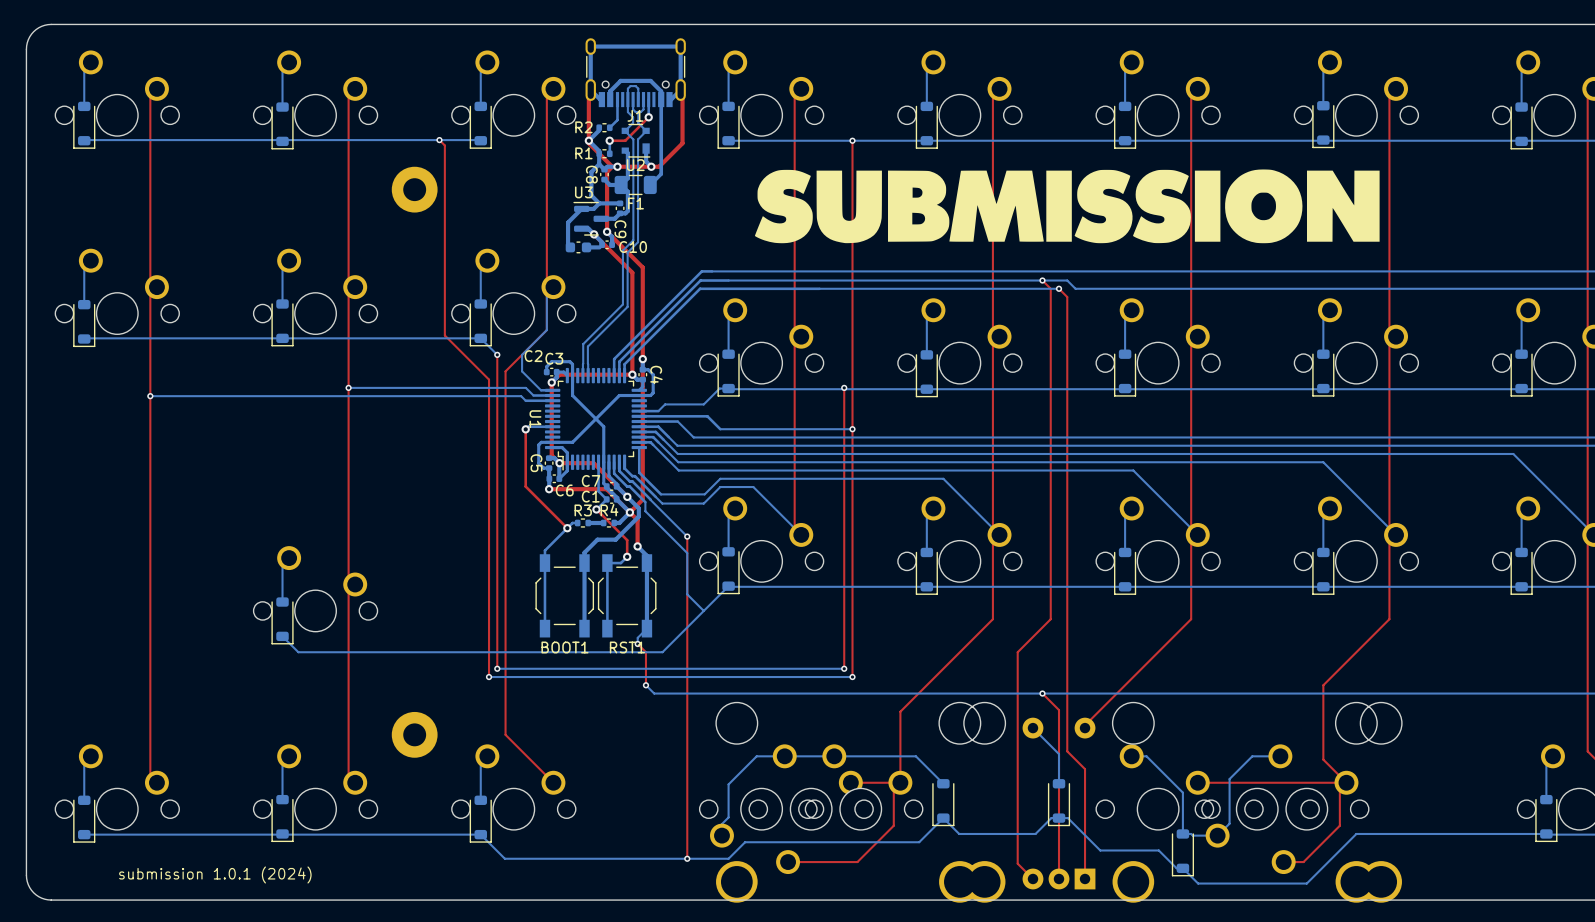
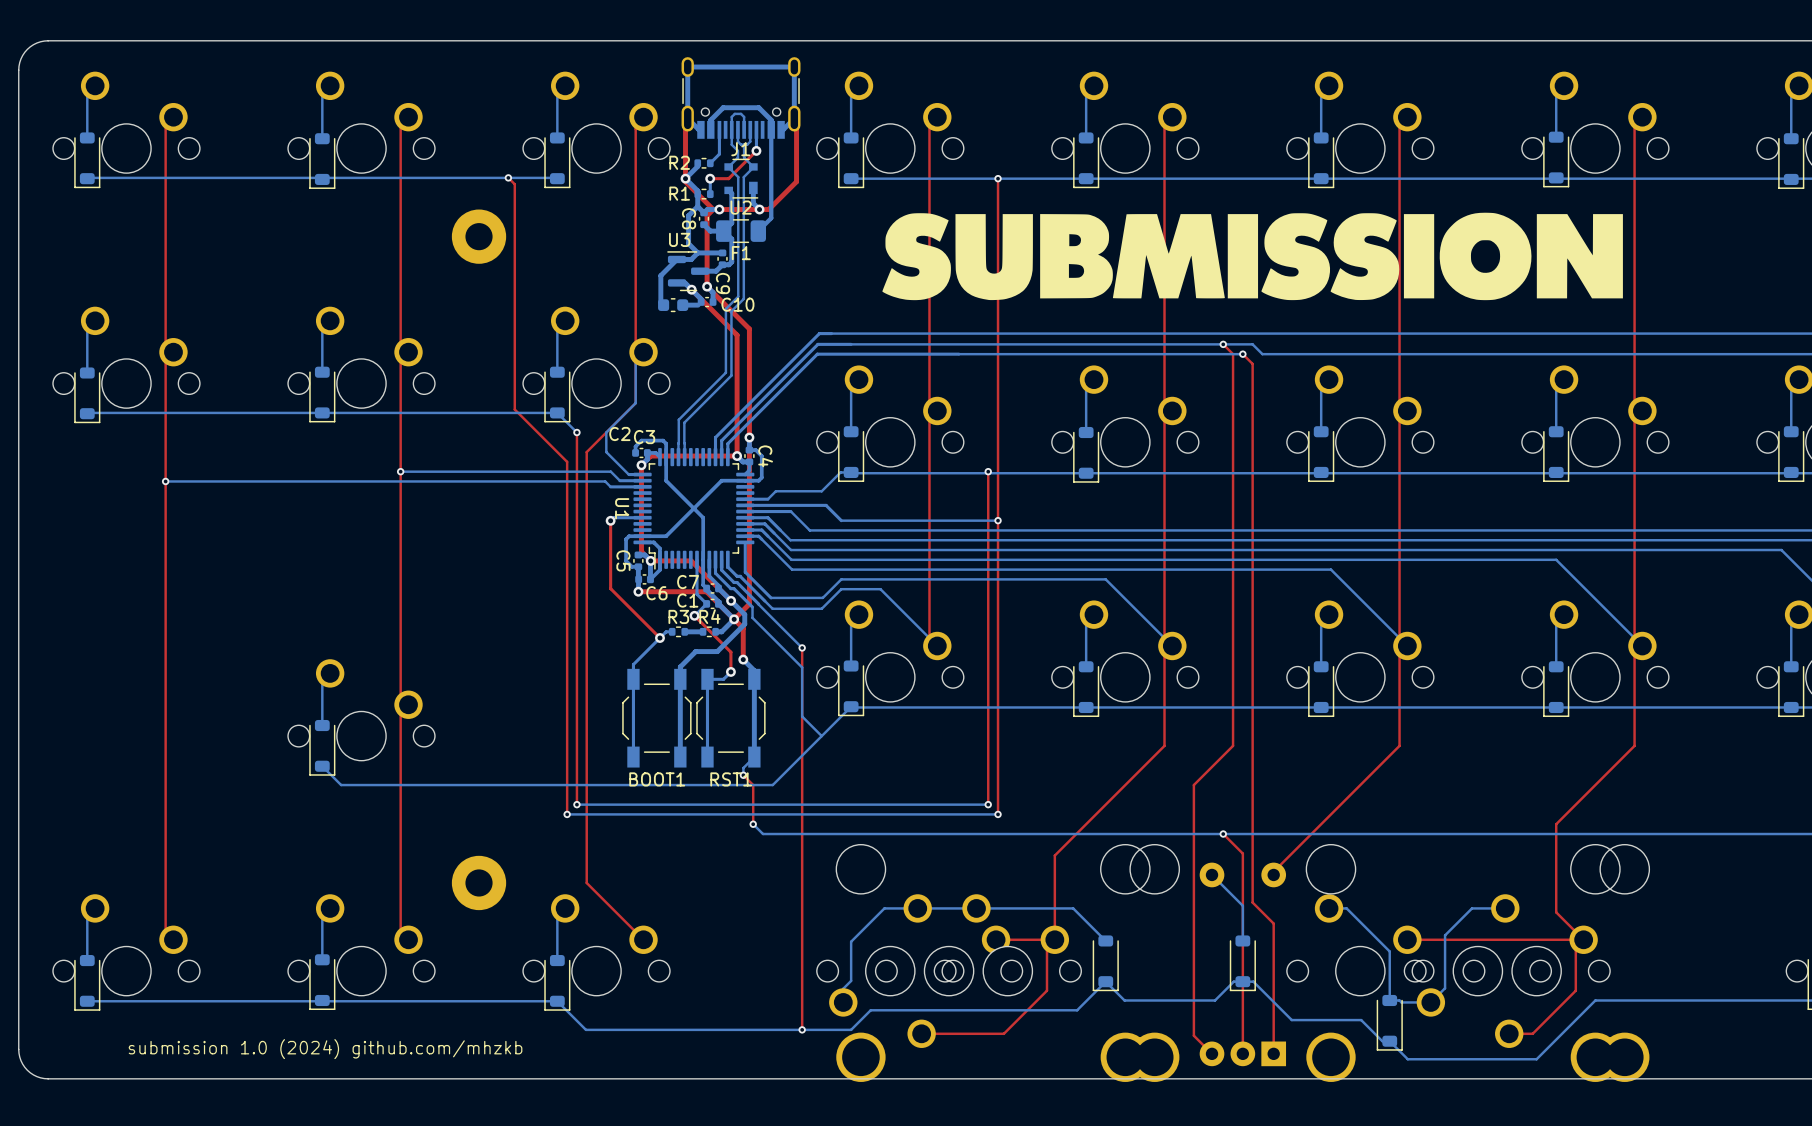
text: submission 1.0.1 (2024) (215, 874) -> submission 1.0 (2024) github.com/mhzkb (325, 1049)

